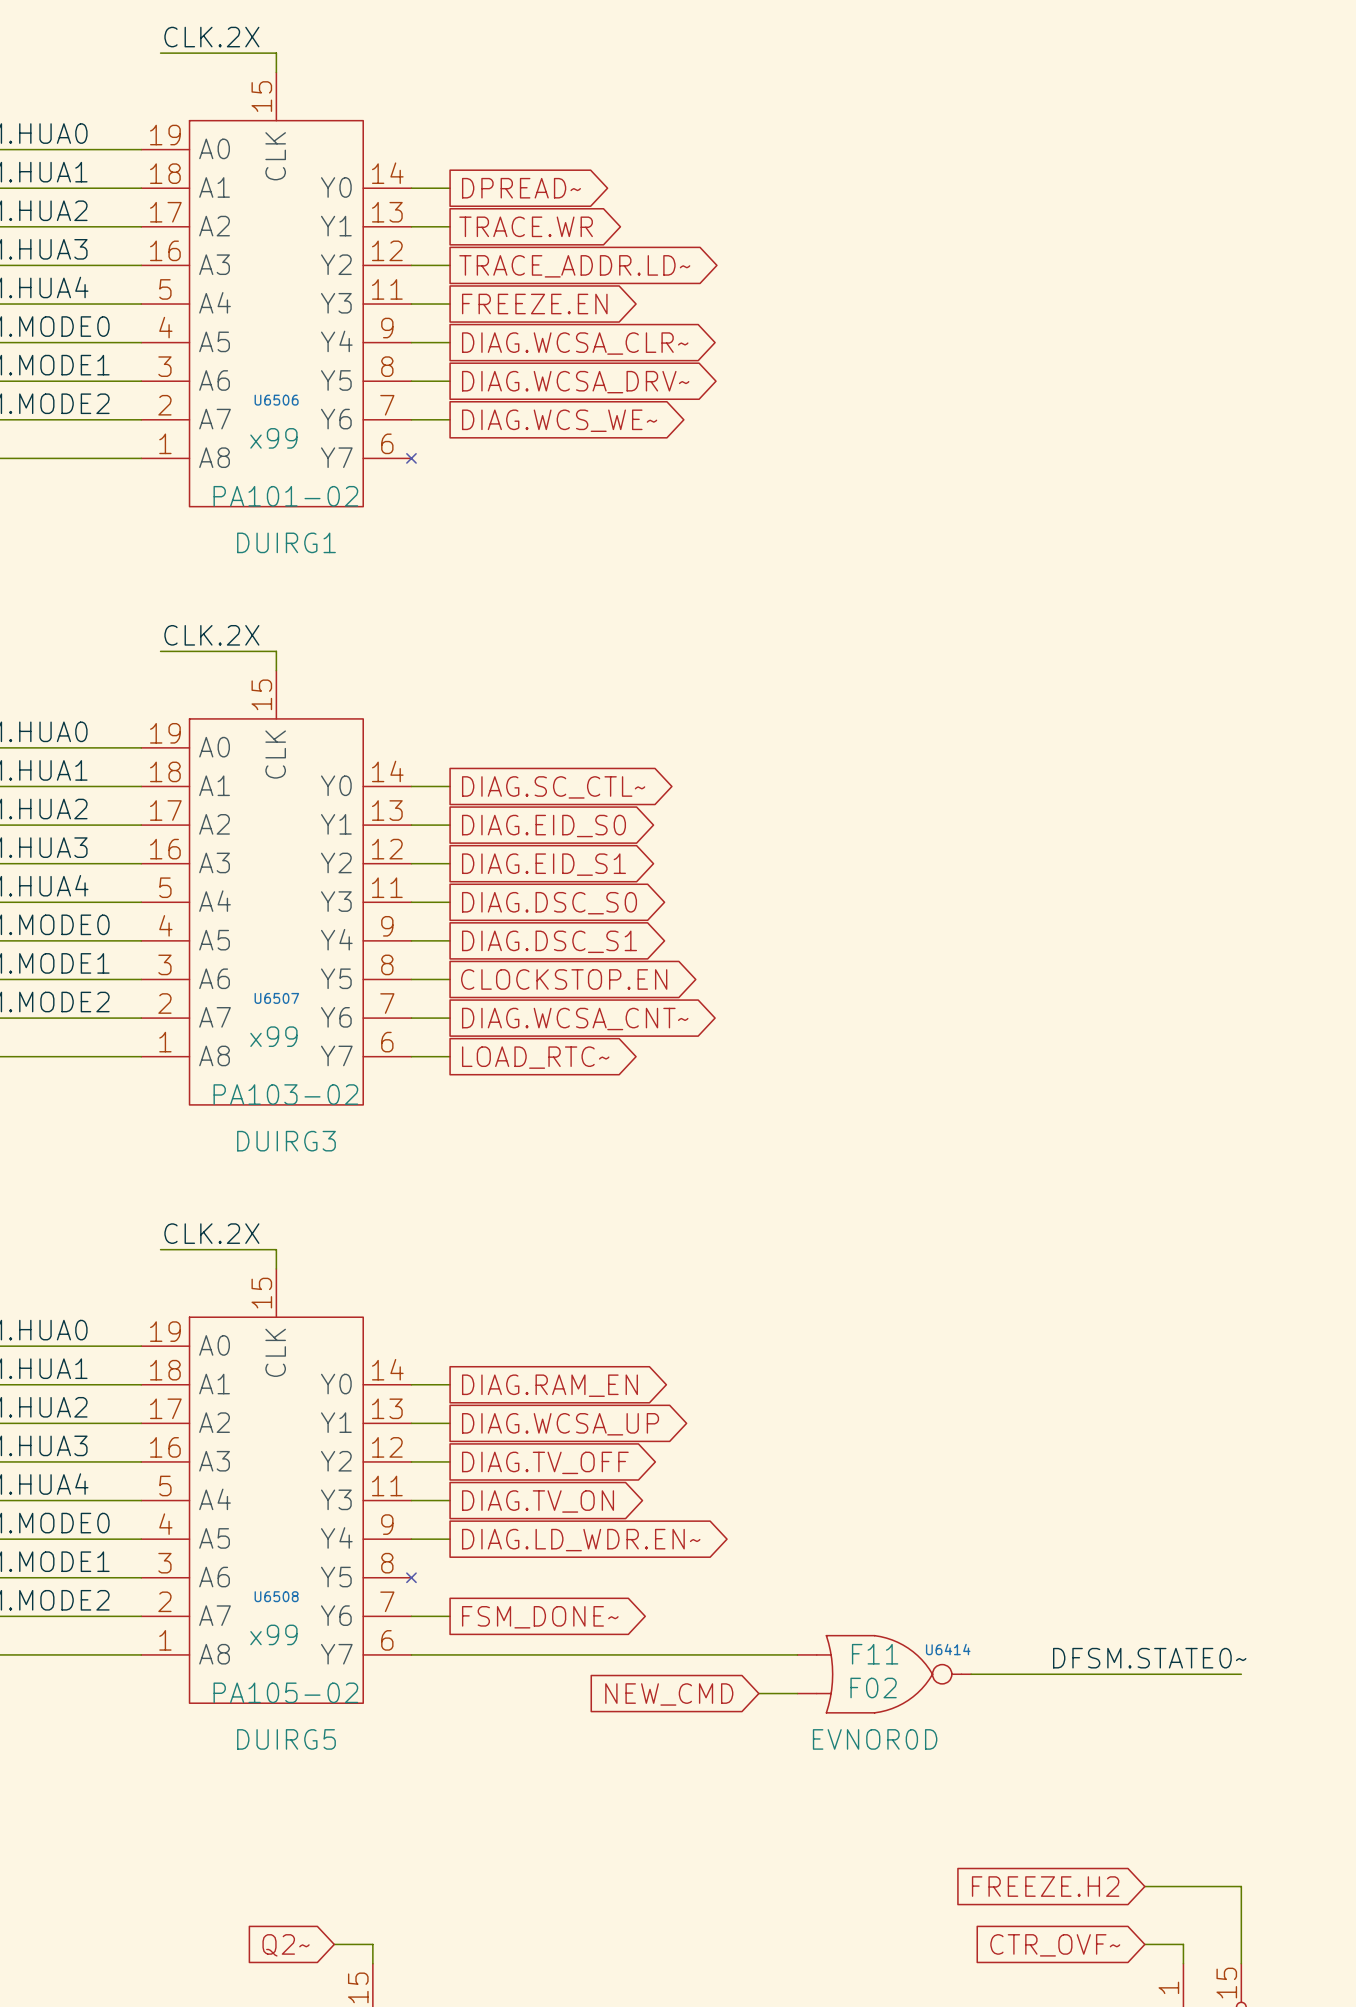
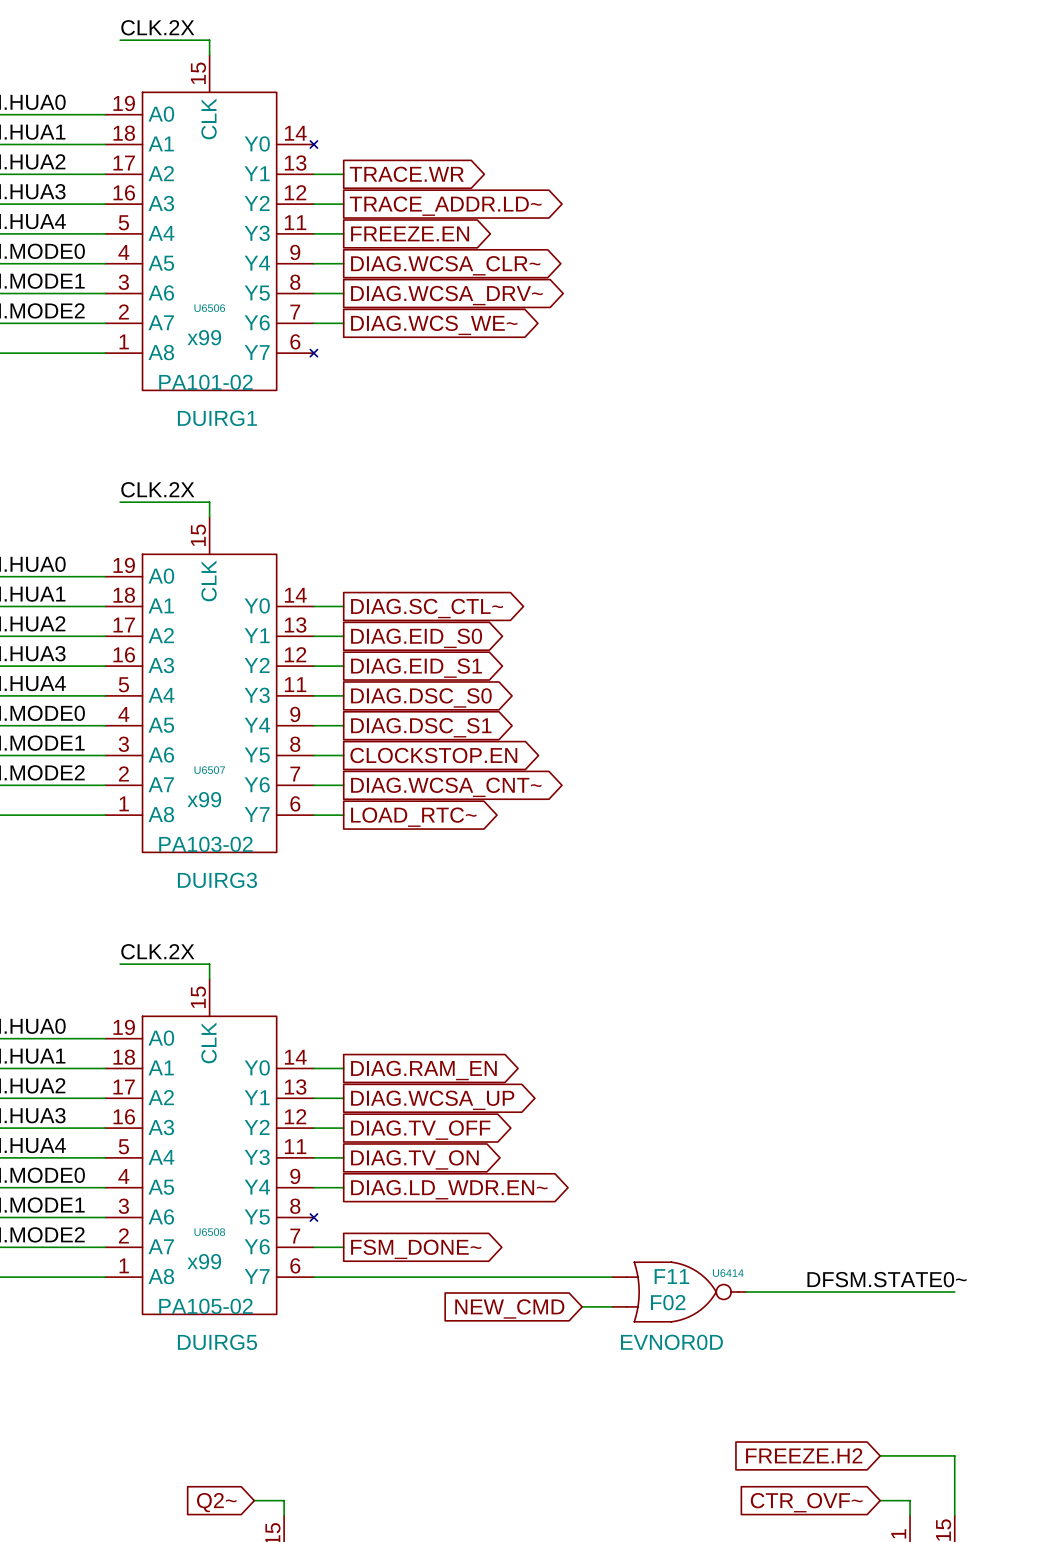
wire: (411, 188) (450, 188) -> none
no-connect mark: none -> (313, 144)
global label: DPREAD~ (521, 188) -> none

